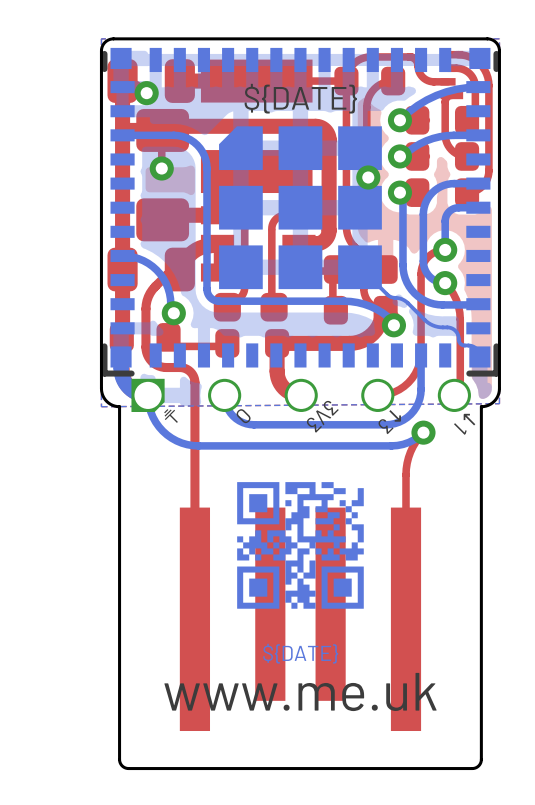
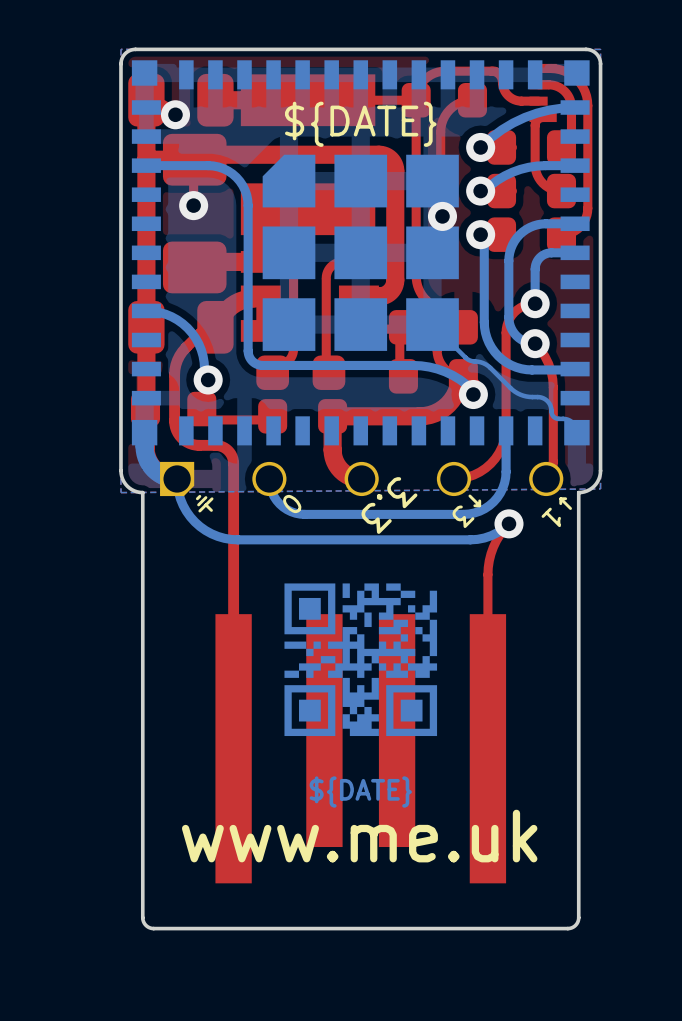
part footprint: [101, 47, 500, 377] -> [131, 60, 590, 446]
part footprint: [131, 378, 471, 412] -> [160, 461, 564, 497]
part footprint: [237, 482, 364, 609] -> [284, 583, 438, 737]

